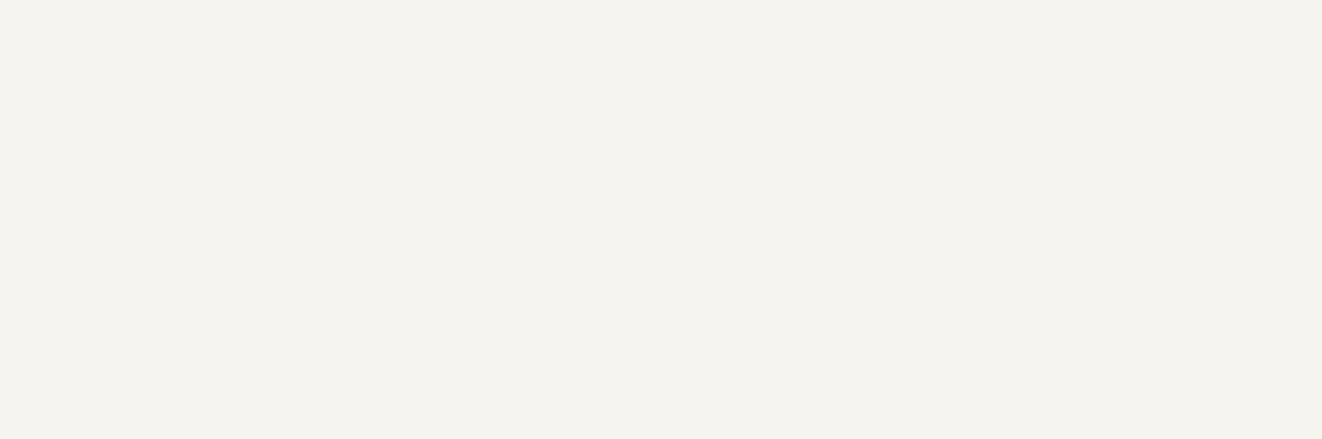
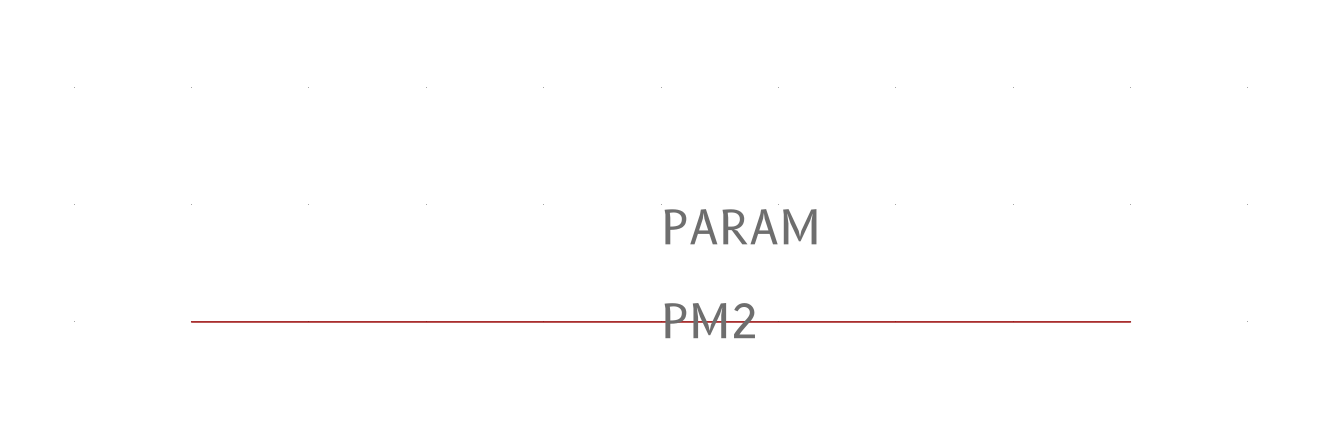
PM2: none -> PARAM (661, 321)

